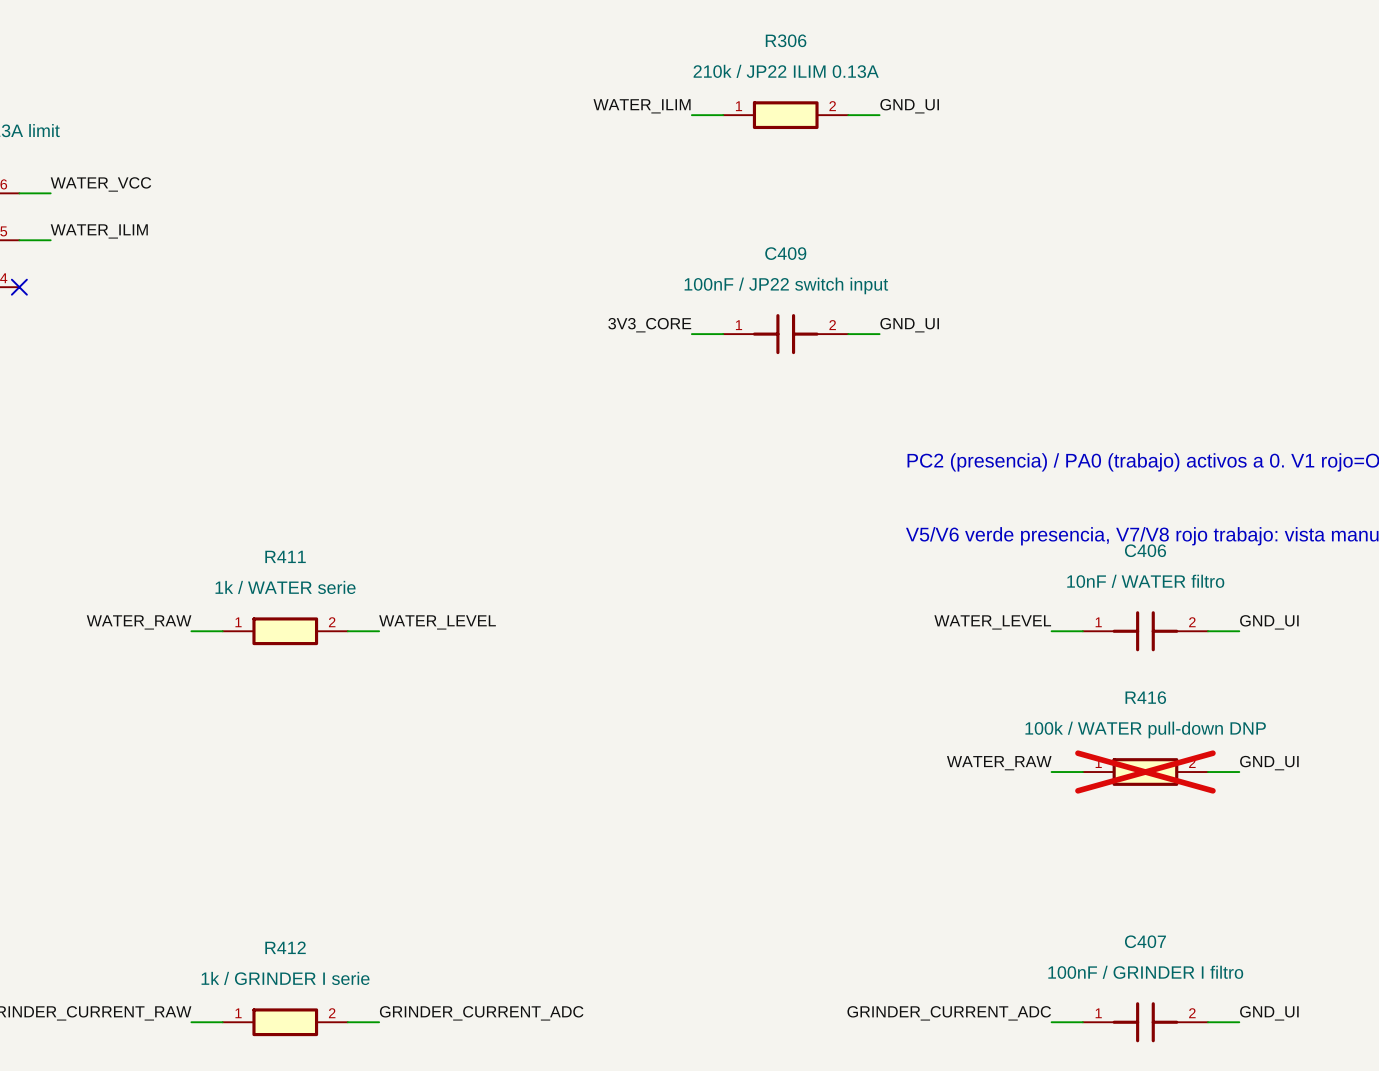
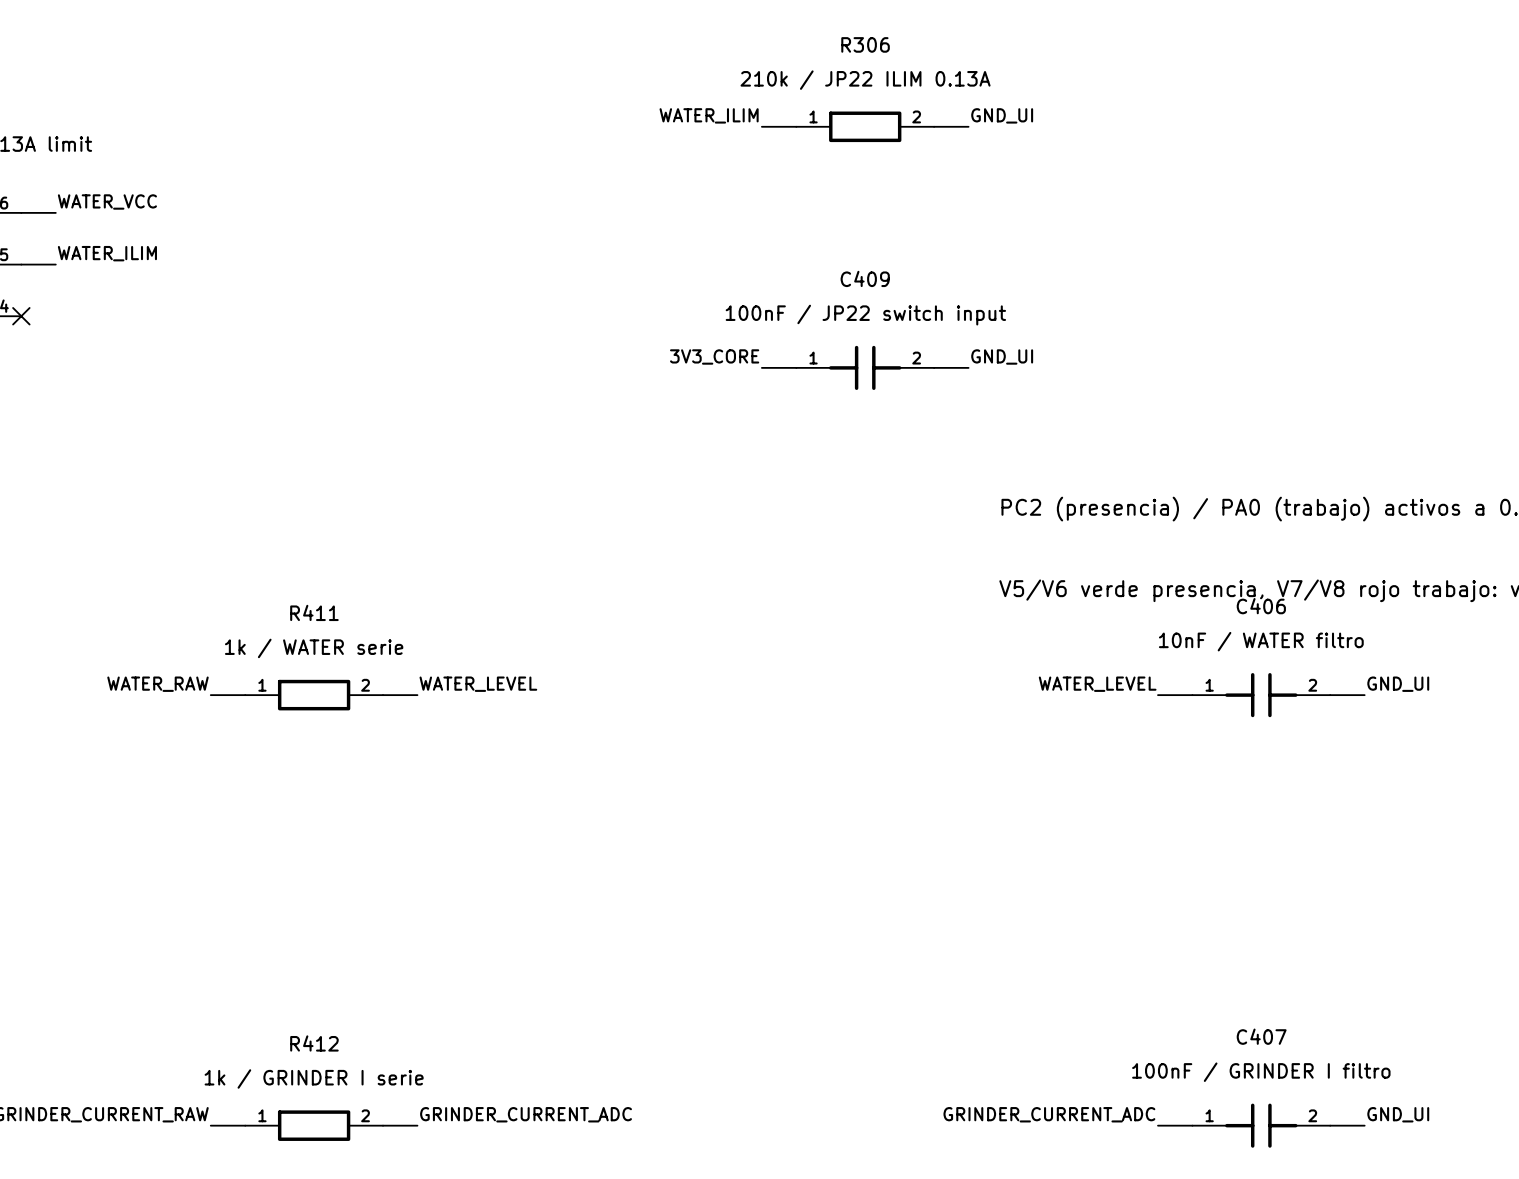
label: WATER_RAW (999, 763) -> none
label: GND_UI (1269, 763) -> none
wire: (1051, 772) (1082, 772) -> none
R416: 100k / WATER pull-down DNP (1145, 772) -> none
wire: (1208, 772) (1239, 772) -> none

